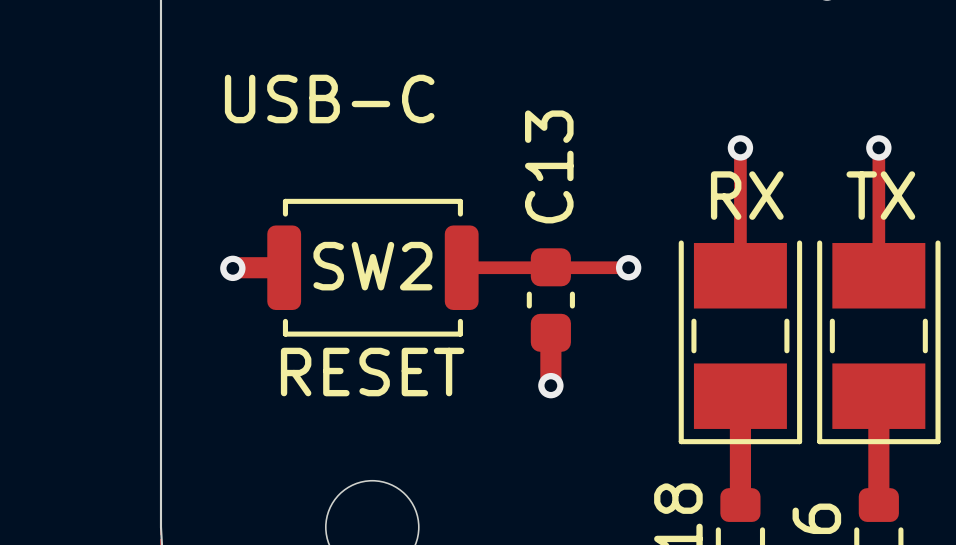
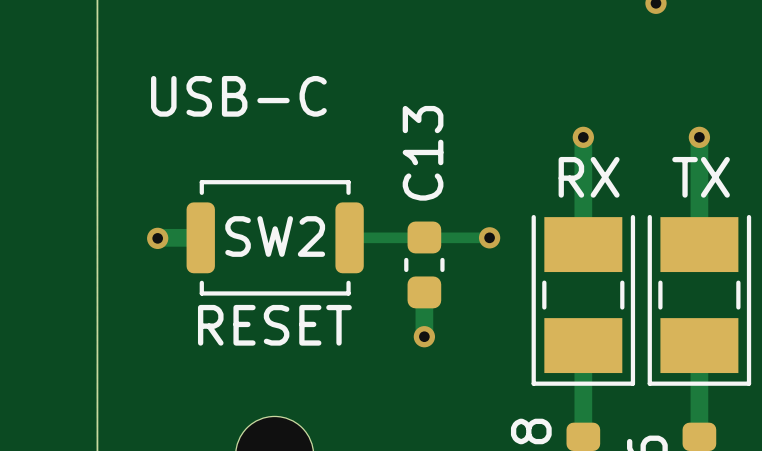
track width: thin (740, 147) (740, 275) -> thick (583, 137) (583, 244)
track width: thin (878, 147) (878, 275) -> thick (699, 137) (699, 244)

